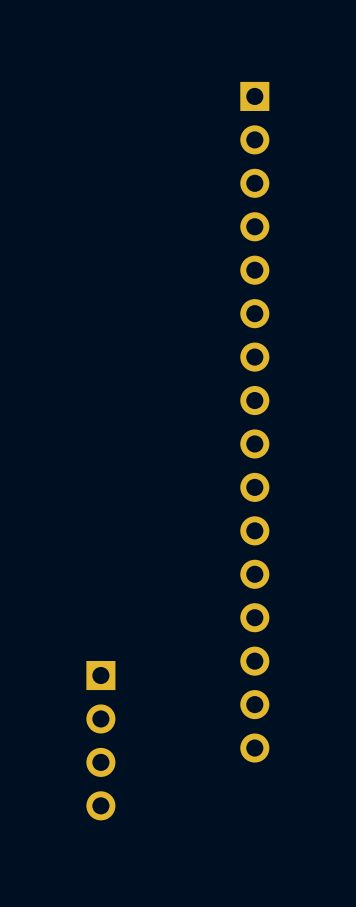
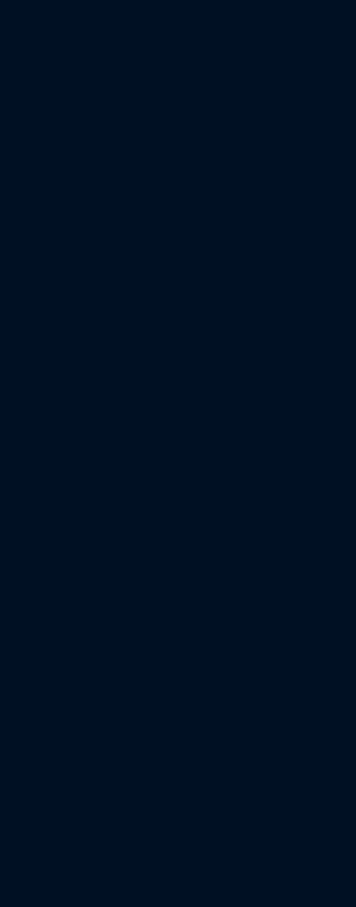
part: (254, 422) -> none
part: (100, 740) -> none

